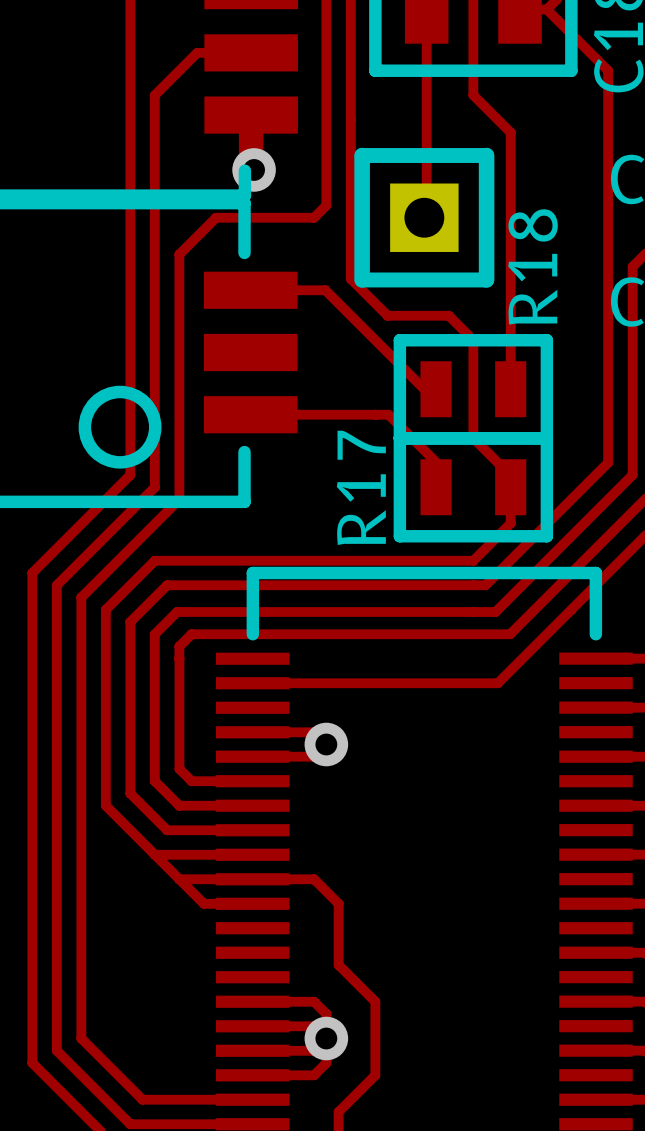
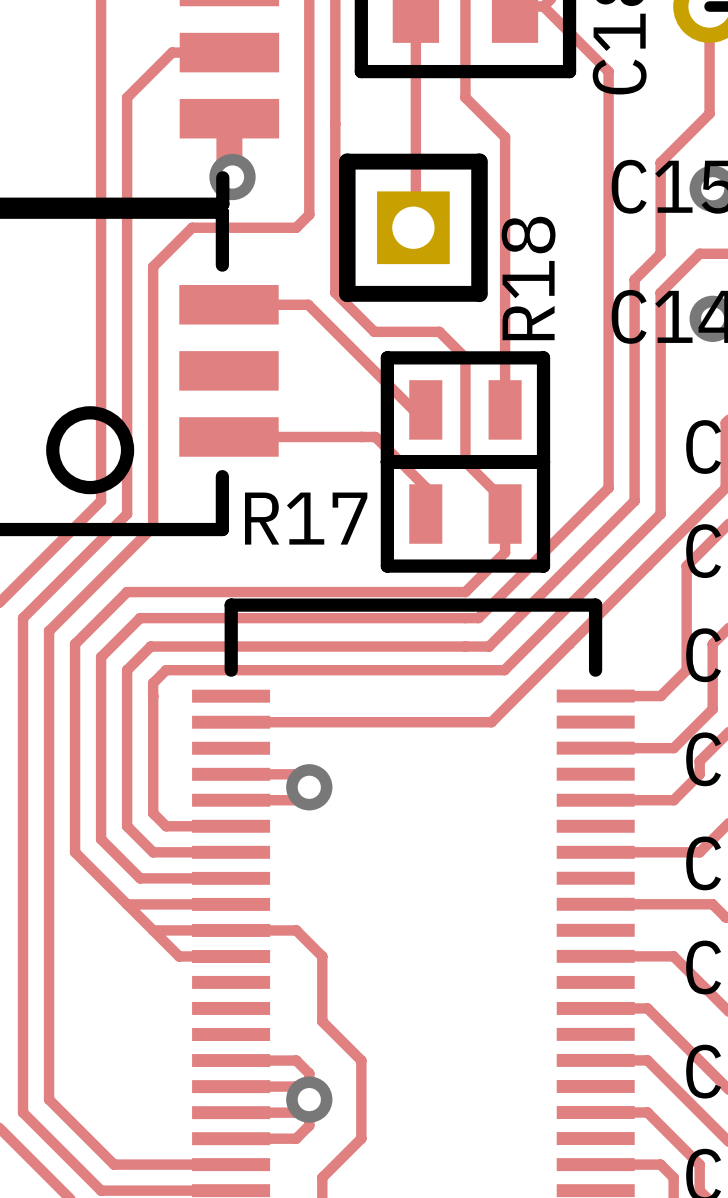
R17 name rotation: 0° (361, 487) -> 90° clockwise (306, 518)

